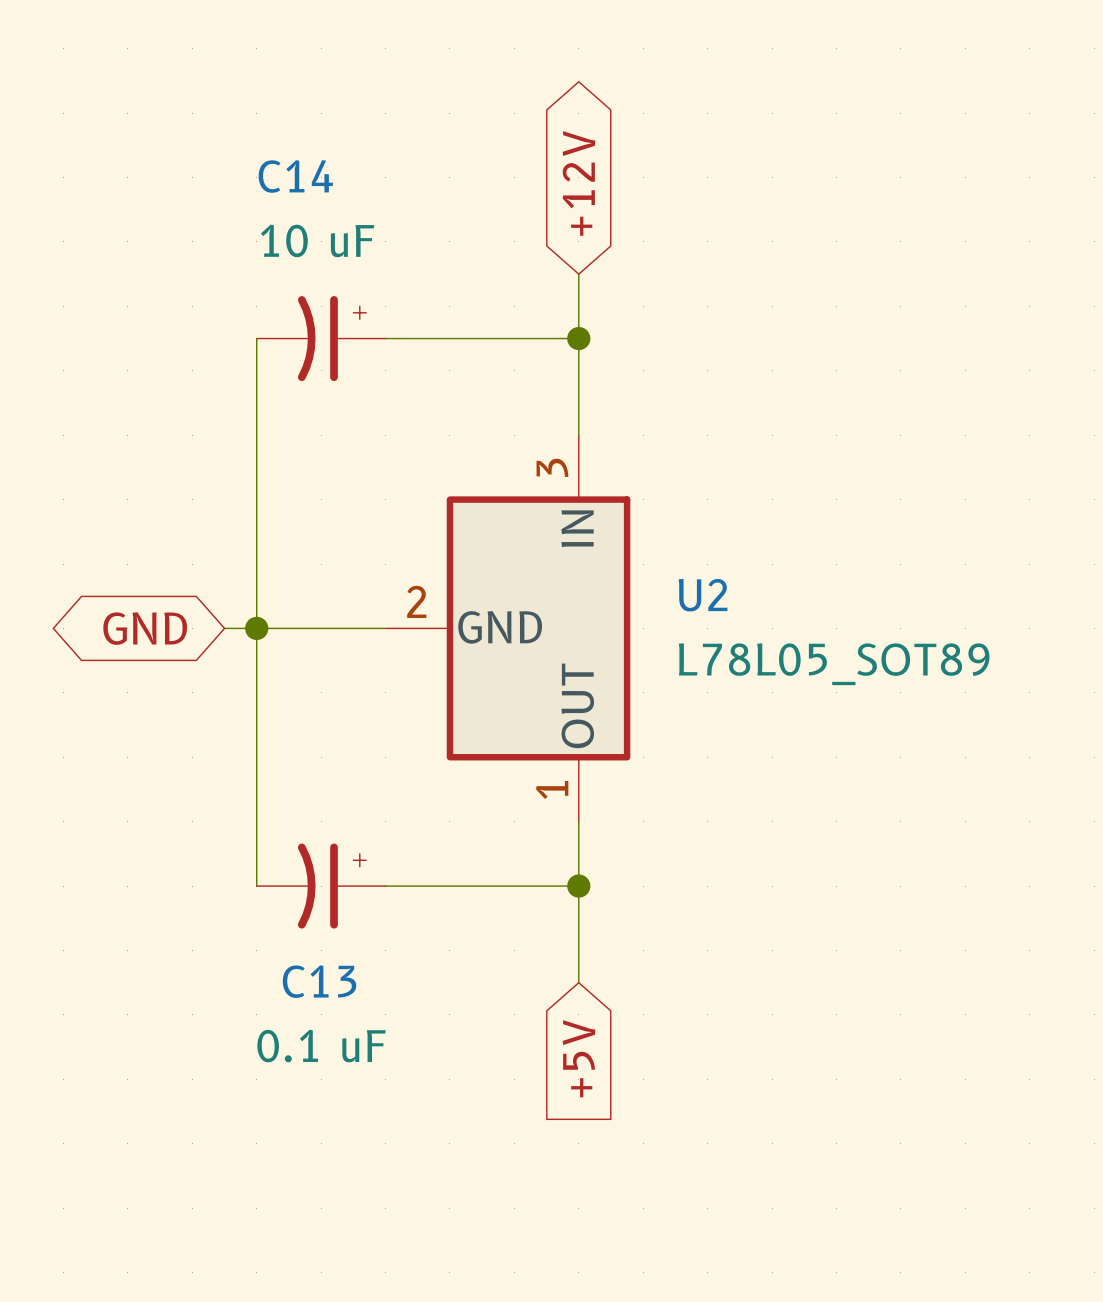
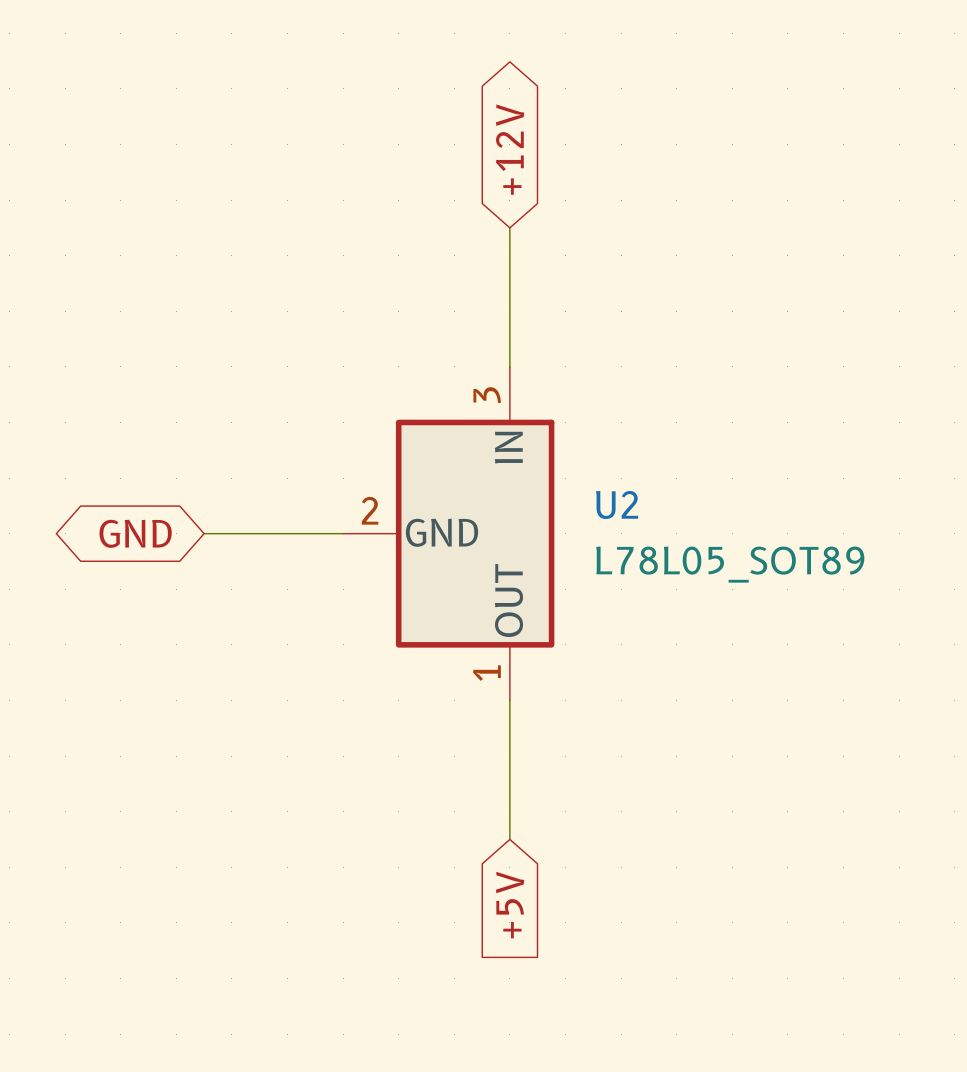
wire: (256, 338) (256, 886) -> none
C14: 10 uF (321, 338) -> none
wire: (385, 338) (578, 338) -> none
junction: (578, 338) -> none
junction: (256, 628) -> none
C13: 0.1 uF (321, 886) -> none
wire: (385, 886) (578, 886) -> none
junction: (578, 886) -> none

